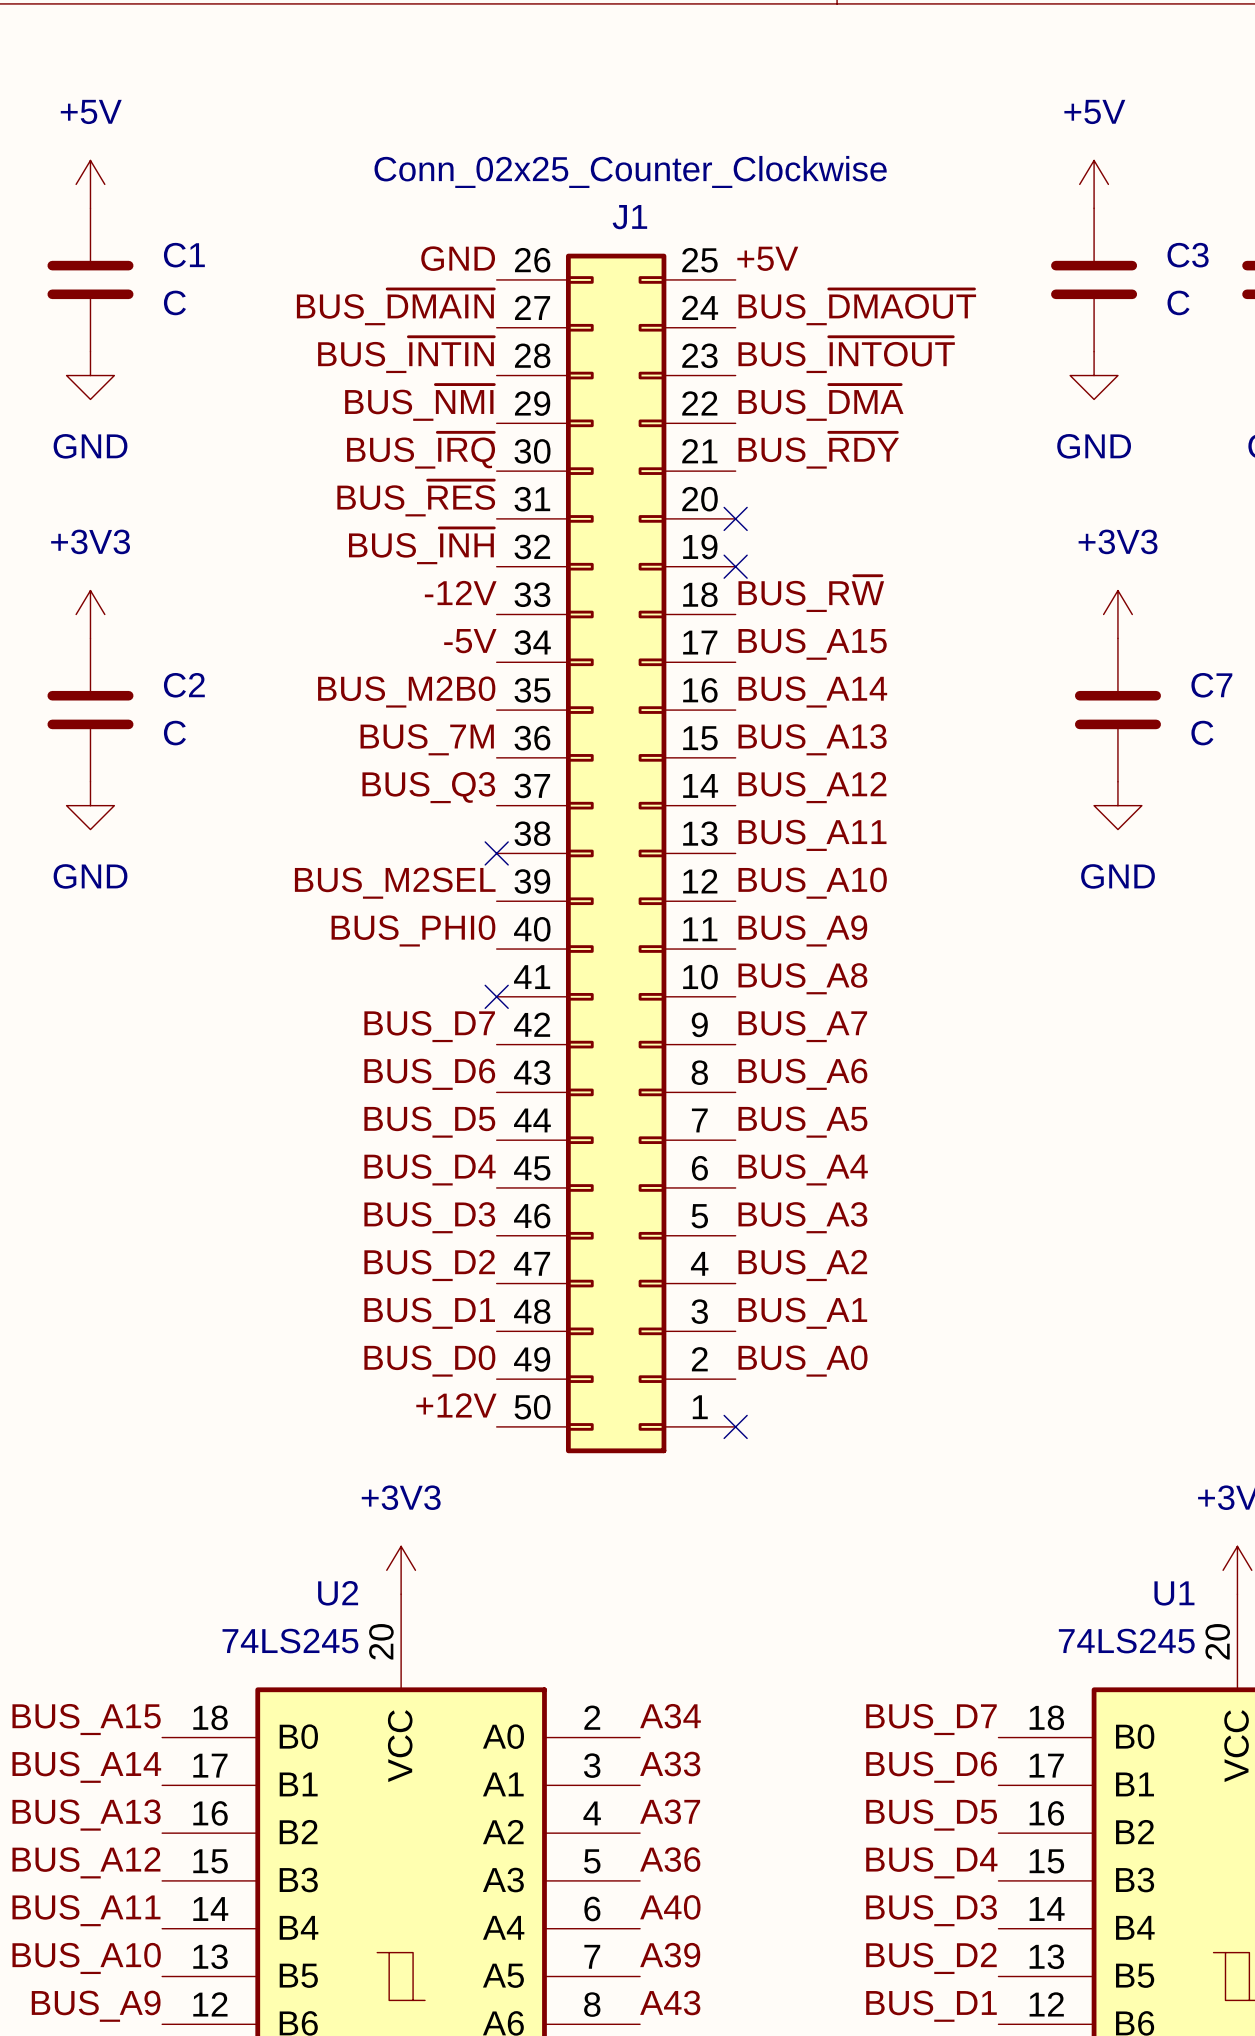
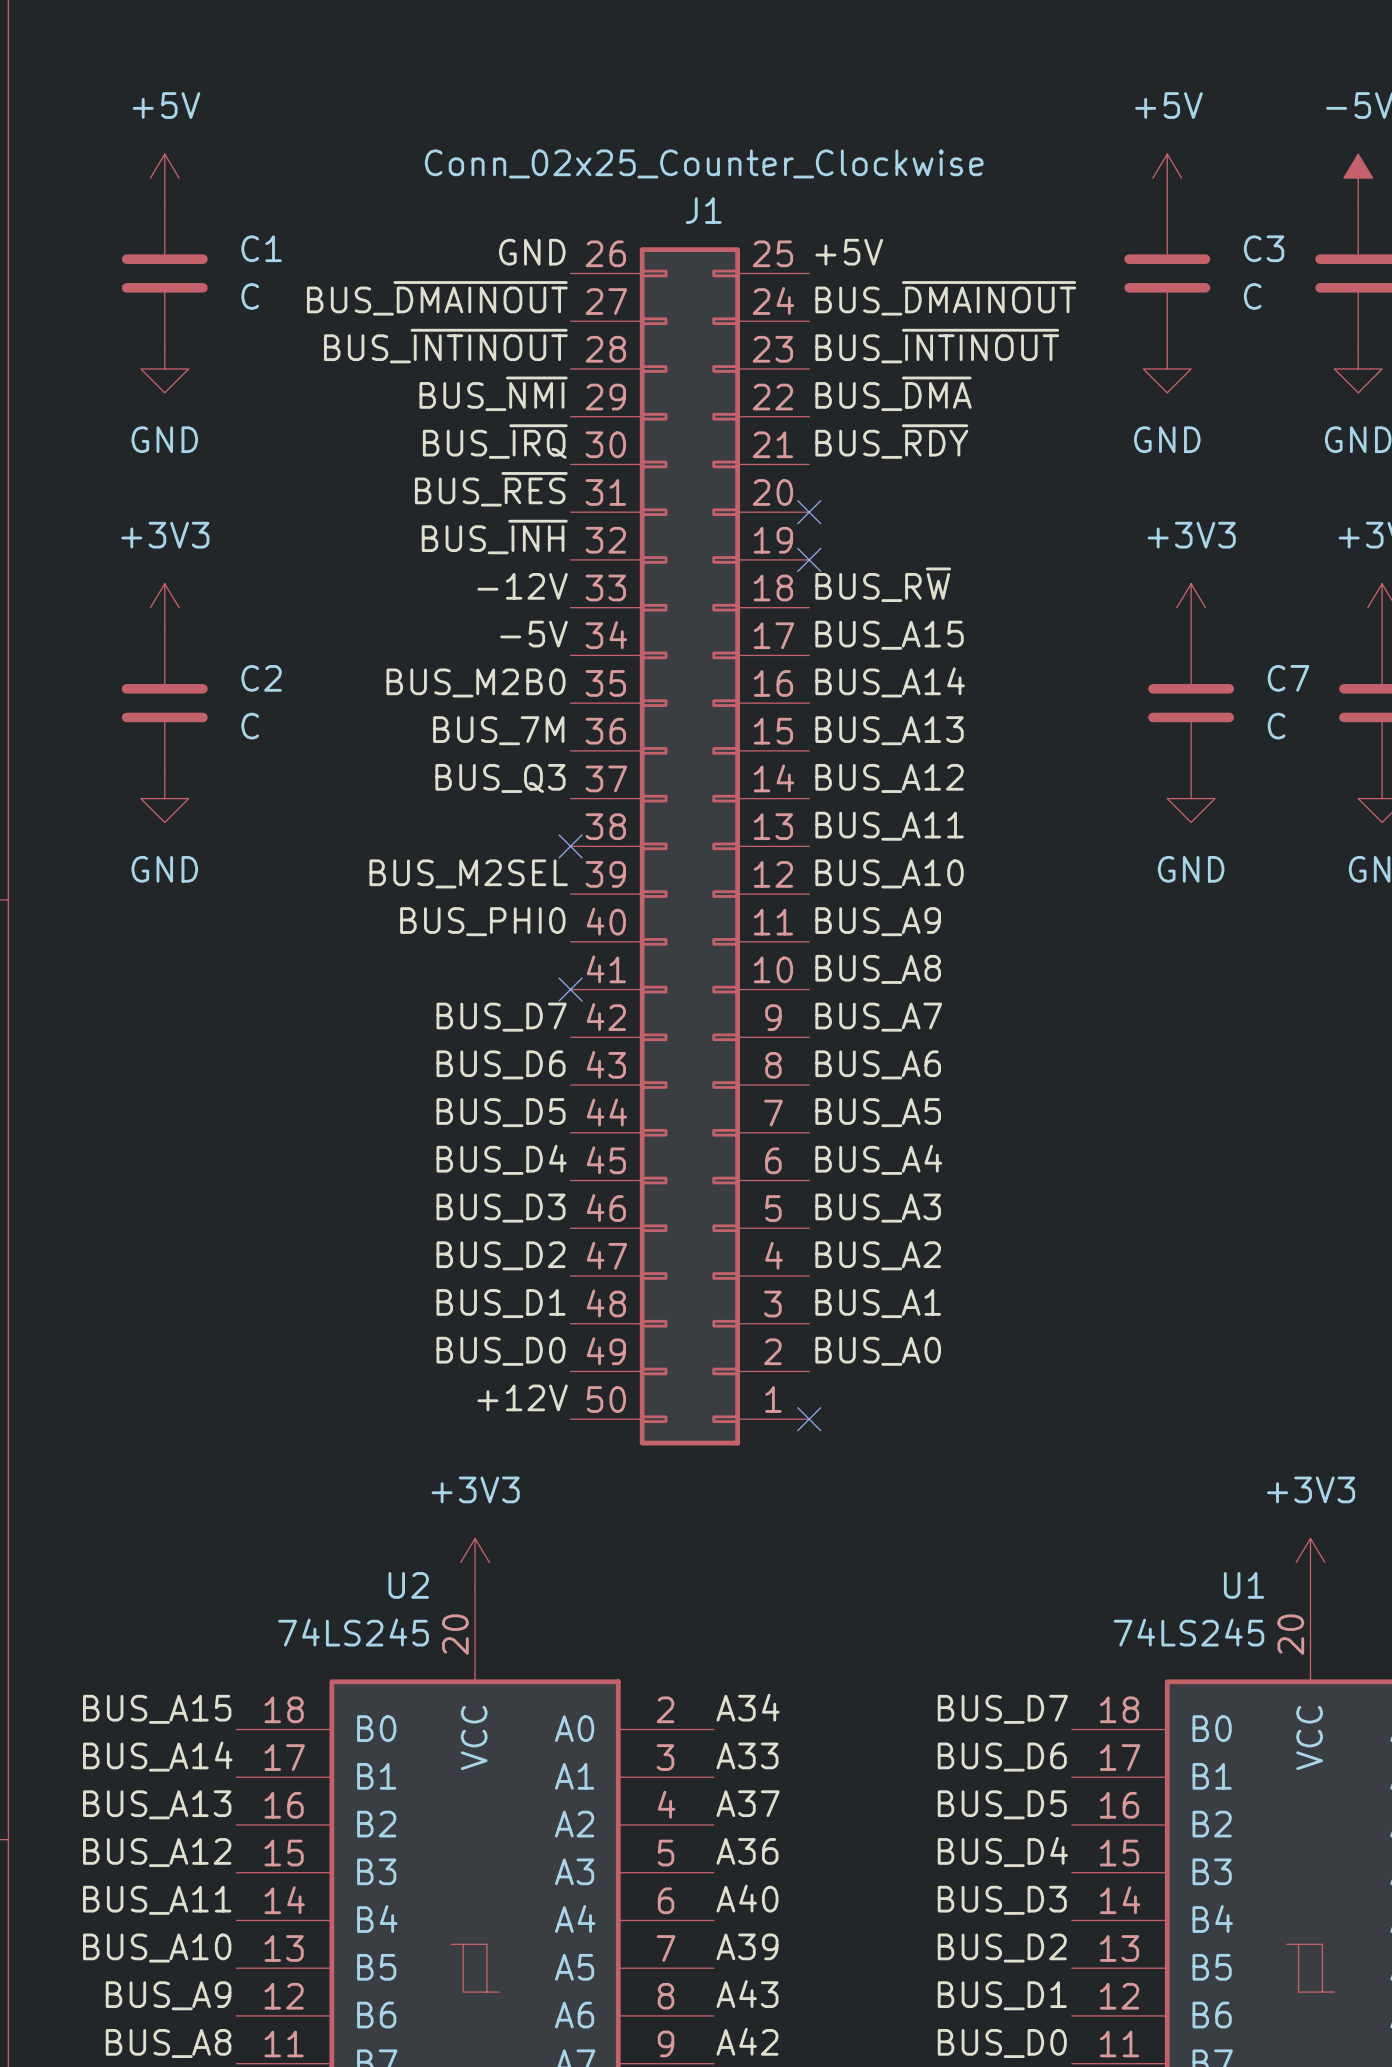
label: BUS_~{DMAIN} (395, 307) -> BUS_~{DMAINOUT} (437, 298)
label: BUS_~{DMAOUT} (857, 307) -> BUS_~{DMAINOUT} (945, 298)
label: BUS_~{INTIN} (406, 354) -> BUS_~{INTINOUT} (445, 346)
label: BUS_~{INTOUT} (846, 354) -> BUS_~{INTINOUT} (937, 346)

